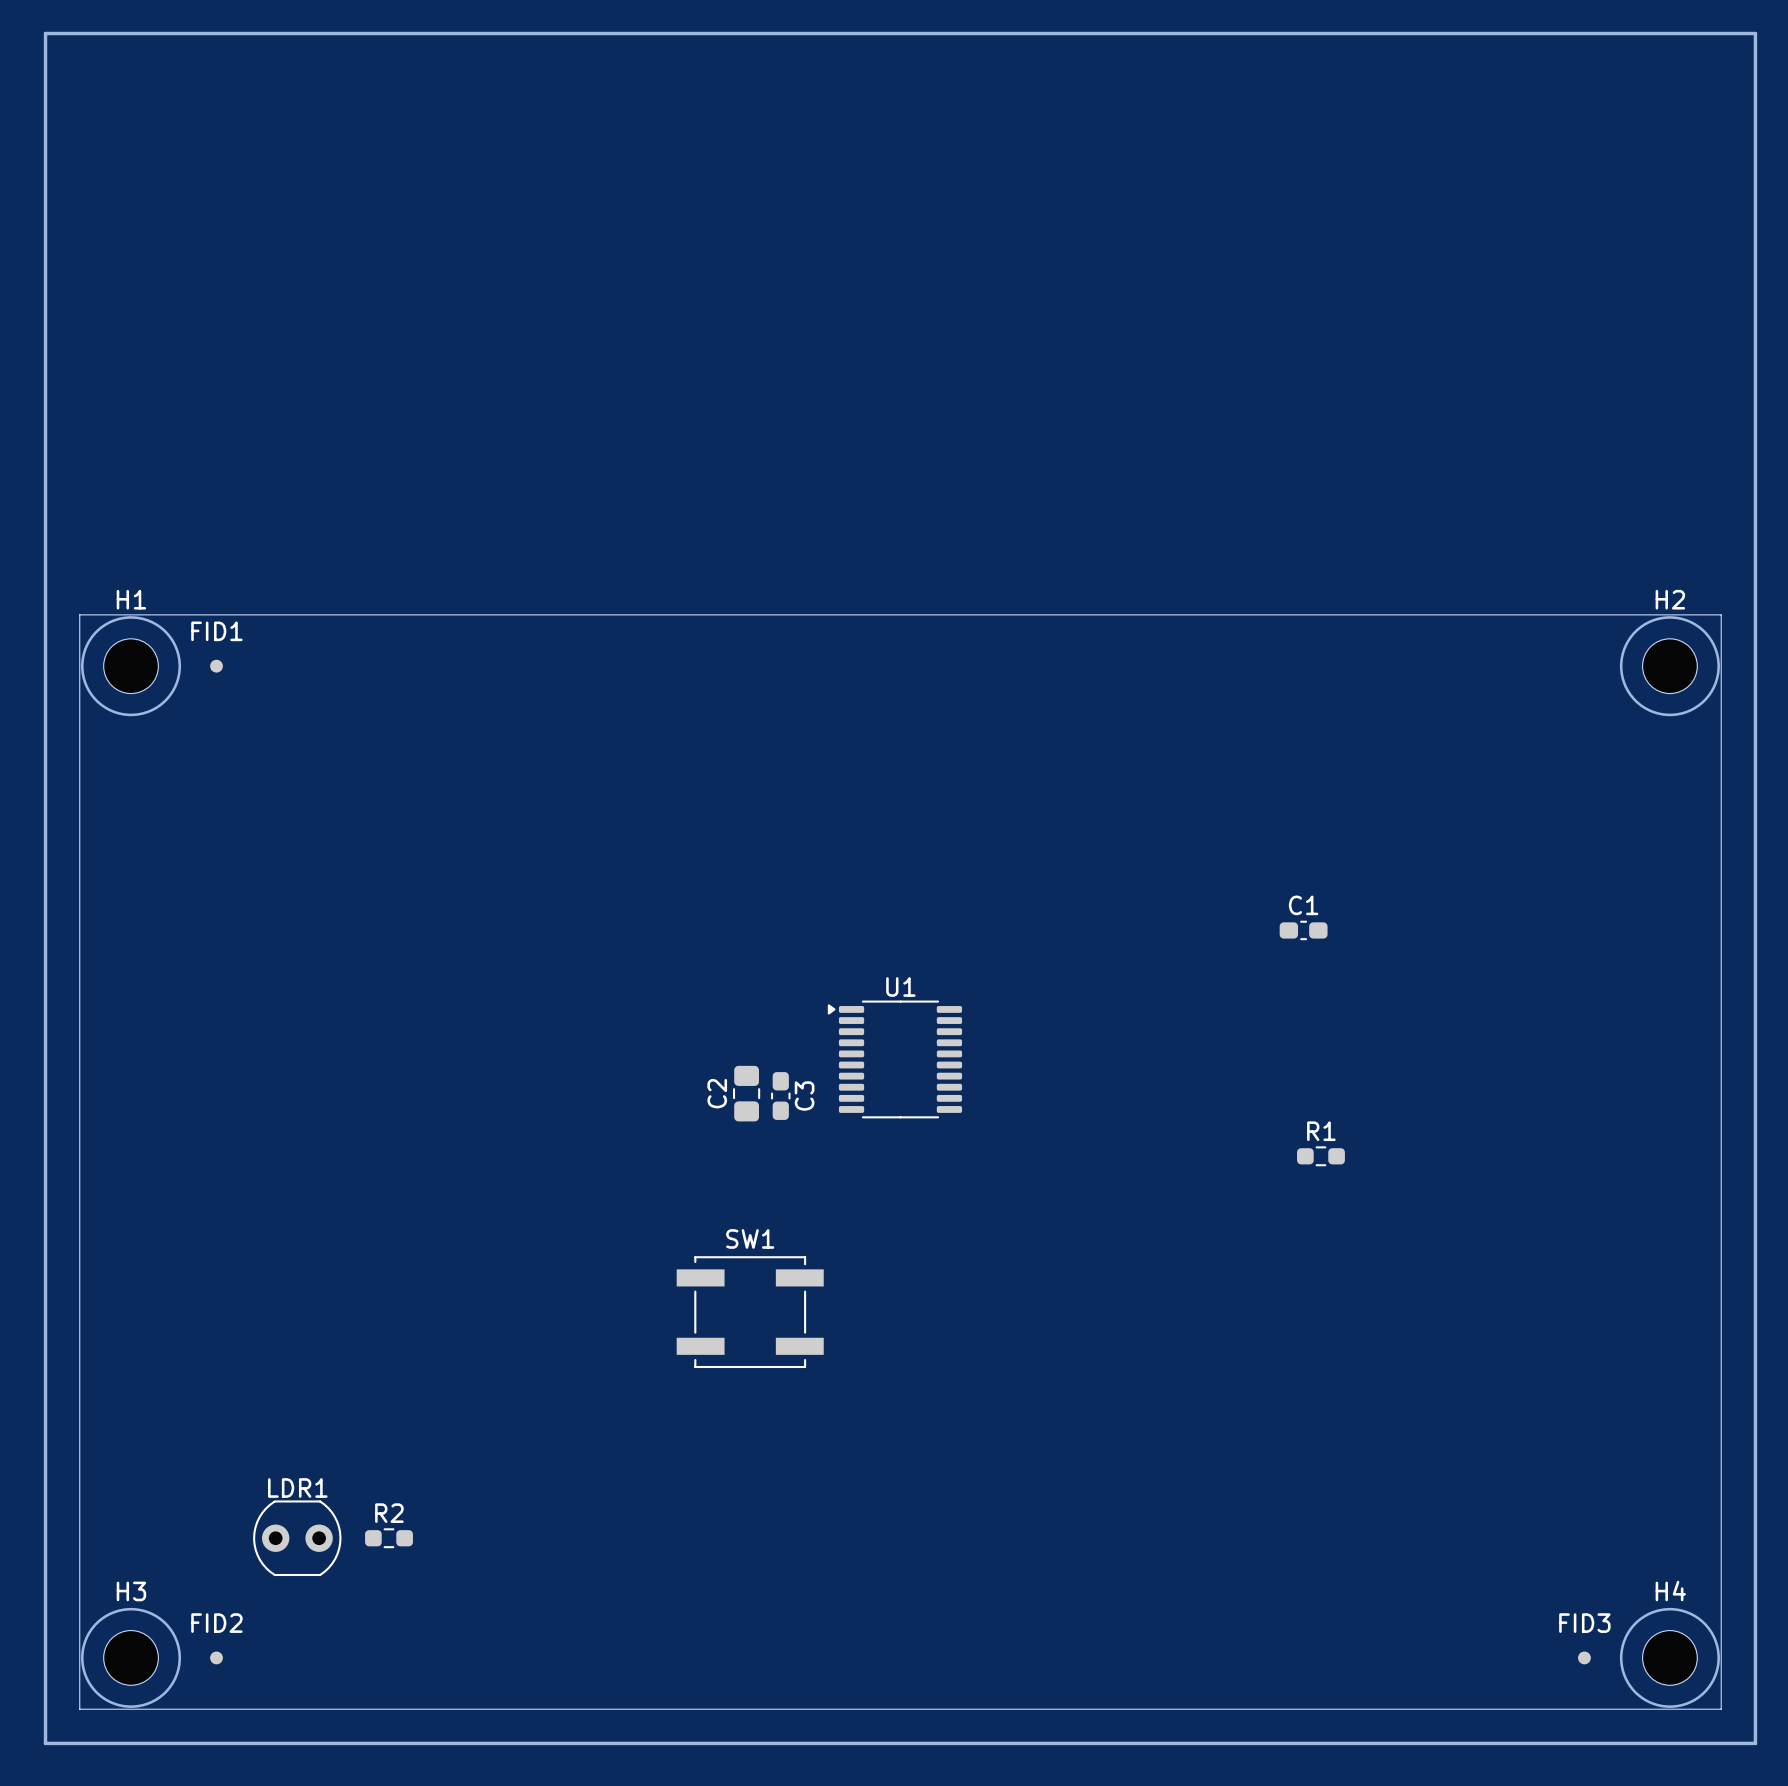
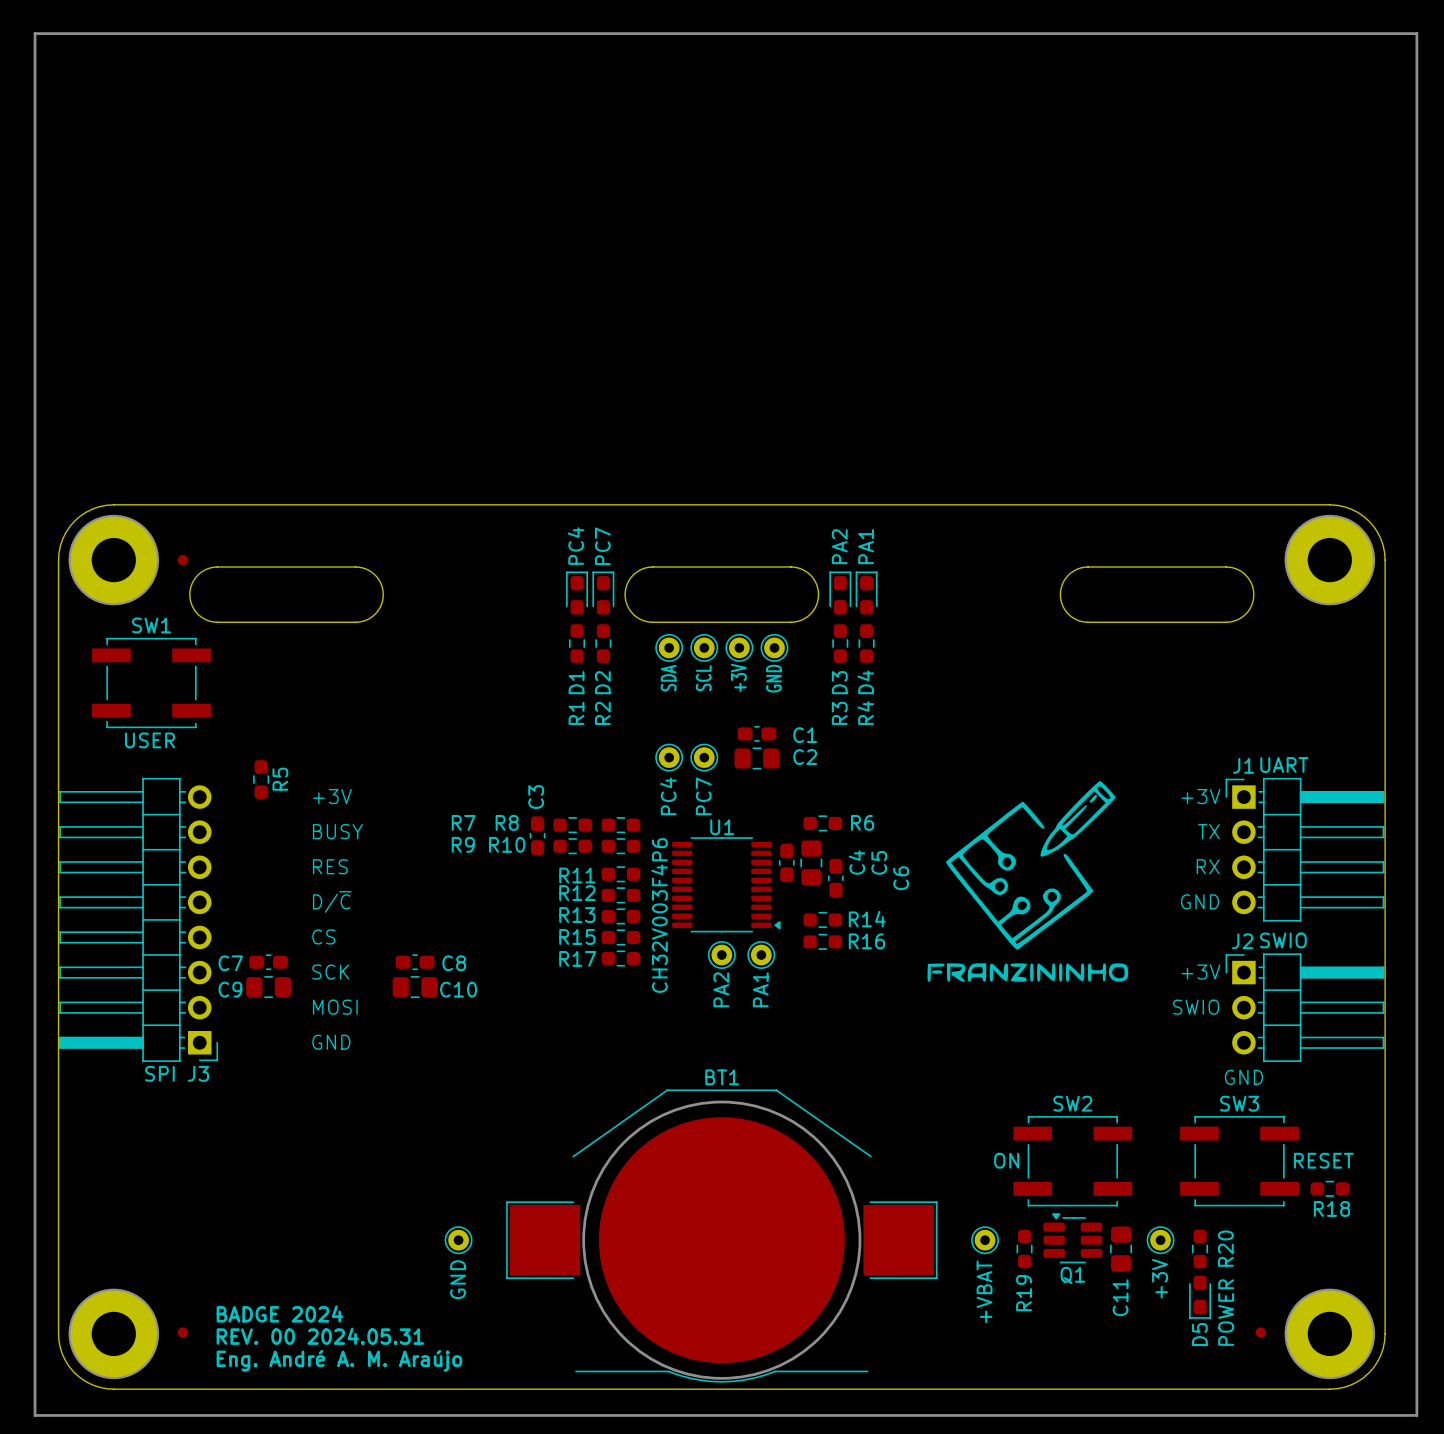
board edge: (79, 614) (1721, 614) (1721, 1709) (79, 1709) (79, 614) -> (113, 504) (92, 509) (74, 521) (62, 538) (58, 560) (58, 1333) (60, 1348) (65, 1361) (80, 1377) (99, 1387) (113, 1389) (1329, 1389) (1344, 1387) (1357, 1381) (1373, 1367) (1383, 1348) (1385, 1333) (1385, 560) (1383, 545) (1377, 532) (1363, 516) (1344, 506) (1329, 504) (113, 504)
H1: (131, 666) -> none
FID1: (216, 666) -> none
H2: (1669, 666) -> none
part: none -> (113, 560)
part: none -> (182, 560)
part: none -> (1329, 560)
board edge: none -> (217, 567) (362, 567) (371, 571) (378, 578) (383, 591) (382, 601) (373, 615) (358, 622) (210, 621) (201, 617) (194, 610) (190, 601) (190, 591) (192, 581) (199, 573) (207, 568) (217, 567)
board edge: none -> (652, 567) (798, 567) (807, 572) (814, 580) (818, 591) (817, 601) (807, 616) (794, 622) (645, 621) (635, 616) (628, 608) (625, 591) (628, 580) (635, 572) (652, 567)
board edge: none -> (1088, 567) (1233, 567) (1243, 572) (1250, 580) (1253, 591) (1252, 601) (1245, 614) (1229, 622) (1080, 621) (1066, 611) (1061, 601) (1060, 591) (1068, 575) (1077, 569) (1088, 567)
D1: none -> PC4 (577, 593)
D2: none -> PC7 (603, 593)
D3: none -> PA2 (840, 593)
D4: none -> PA1 (866, 593)
R3: none -> (840, 643)
R4: none -> (866, 643)
part: none -> SDA (669, 647)
part: none -> SCL (704, 647)
part: none -> +3V (739, 647)
part: none -> GND (774, 647)
C1 name position: C1 (1303, 905) -> C1 (805, 735)
SW1 value: none -> USER (150, 740)
part: none -> PC4 (669, 757)
part: none -> PC7 (704, 757)
C1 position: (1303, 930) -> (756, 733)
R5: none -> (261, 779)
drawing: none -> [927, 780, 1129, 982]
text: none -> +3V (332, 796)
text: none -> +3V (1201, 796)
R6: none -> (822, 823)
R7: none -> (572, 825)
R8: none -> (620, 825)
text: none -> BUSY (337, 831)
text: none -> TX (1208, 831)
R9: none -> (572, 846)
R10: none -> (620, 846)
J1: none -> UART (1304, 849)
U1 rotation: 0° (894, 1059) -> 180° (726, 884)
C4: none -> (786, 862)
C5: none -> (811, 862)
text: none -> RES (330, 866)
text: none -> RX (1208, 866)
R11: none -> (620, 874)
C6: none -> (835, 878)
C2 name position: C2 (717, 1093) -> C2 (805, 757)
C2 rotation: 0° (746, 1093) -> 90° clockwise (756, 758)
C2 position: (746, 1093) -> (756, 758)
C3 position: (780, 1096) -> (537, 835)
C3 name position: C3 (804, 1096) -> C3 (536, 797)
R12: none -> (620, 895)
text: none -> D/~{C} (332, 901)
text: none -> GND (1200, 901)
U1 value: none -> CH32V003F4P6 (659, 915)
R13: none -> (620, 916)
J3: none -> SPI (138, 919)
R14: none -> (822, 919)
R1 name position: R1 (1321, 1131) -> R1 (576, 713)
text: none -> CS (323, 936)
R15: none -> (620, 937)
R1 rotation: 0° (1320, 1156) -> 90° clockwise (577, 643)
R1 position: (1320, 1156) -> (577, 643)
R16: none -> (822, 941)
part: none -> PA2 (721, 955)
part: none -> PA1 (761, 955)
R17: none -> (620, 958)
C7: none -> (268, 962)
C8: none -> (415, 962)
text: none -> SCK (330, 972)
text: none -> +3V (1201, 972)
C9: none -> (268, 987)
C10: none -> (415, 987)
text: none -> MOSI (335, 1007)
text: none -> SWIO (1196, 1007)
J2: none -> SWIO (1304, 1007)
text: none -> GND (331, 1042)
SW1 rotation: 0° (750, 1312) -> 180° (151, 683)
SW1 position: (750, 1312) -> (151, 683)
text: none -> GND (1243, 1077)
SW2: none -> ON (1072, 1161)
SW3: none -> RESET (1239, 1161)
R18: none -> (1329, 1188)
R2 name position: R2 (389, 1513) -> R2 (602, 713)
BT1: none -> (721, 1236)
Q1: none -> (1072, 1238)
part: none -> GND (458, 1240)
part: none -> +VBAT (985, 1240)
part: none -> +3V (1160, 1240)
R19: none -> (1024, 1248)
C11: none -> (1121, 1248)
R20: none -> (1200, 1248)
LDR1: (297, 1538) -> none
R2 rotation: 0° (389, 1538) -> 90° clockwise (603, 643)
R2 position: (389, 1538) -> (603, 643)
D5: none -> POWER (1200, 1297)
text: none -> BADGE 2024 (279, 1314)
part: none -> (182, 1332)
part: none -> (1260, 1332)
part: none -> (113, 1333)
part: none -> (1329, 1333)
text: none -> REV. 00 2024.05.31 (320, 1336)
H3: (131, 1657) -> none
FID2: (216, 1657) -> none
FID3: (1584, 1657) -> none
H4: (1669, 1657) -> none
text: none -> Eng. André A. M. Araújo (339, 1360)

